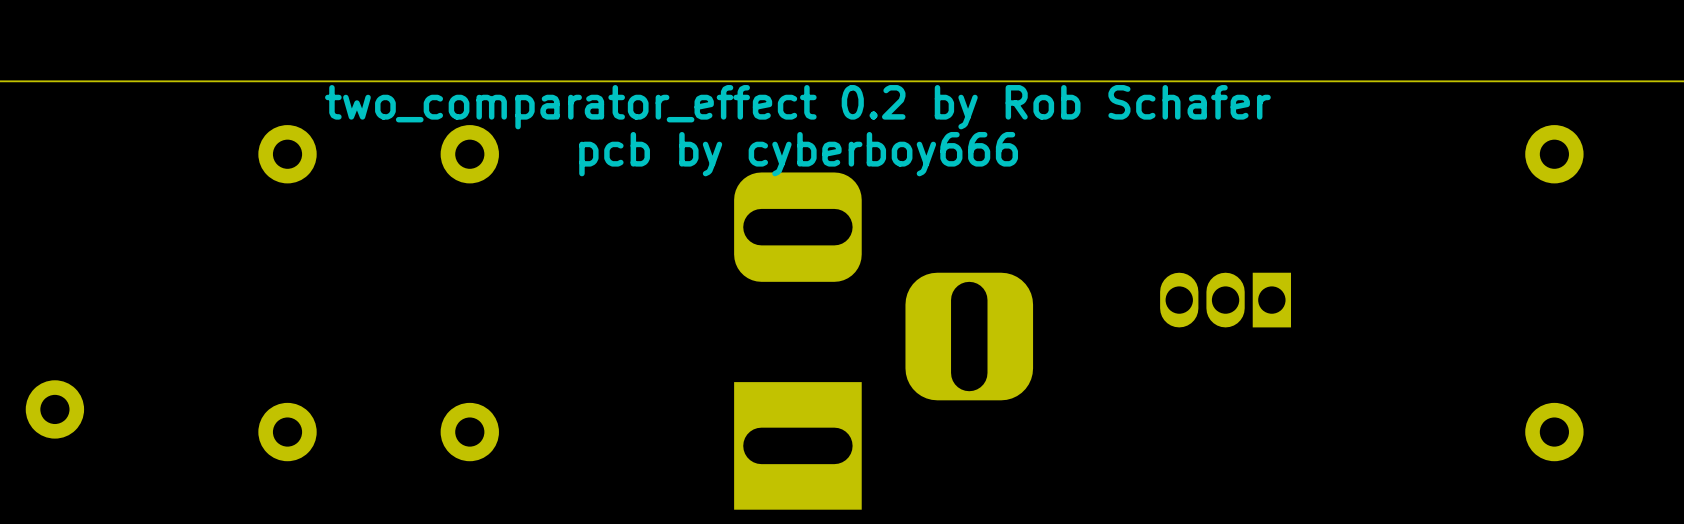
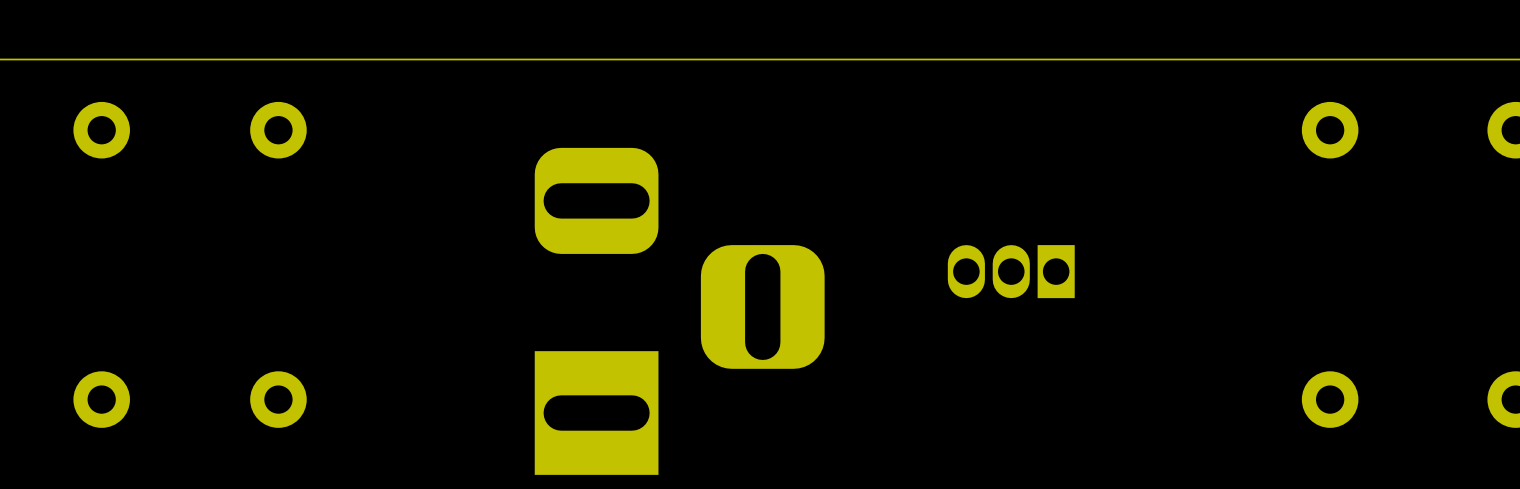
text: two_comparator_effect 0.2 by Rob Schafer (797, 107) -> none
text: pcb by cyberboy666 (798, 154) -> none

